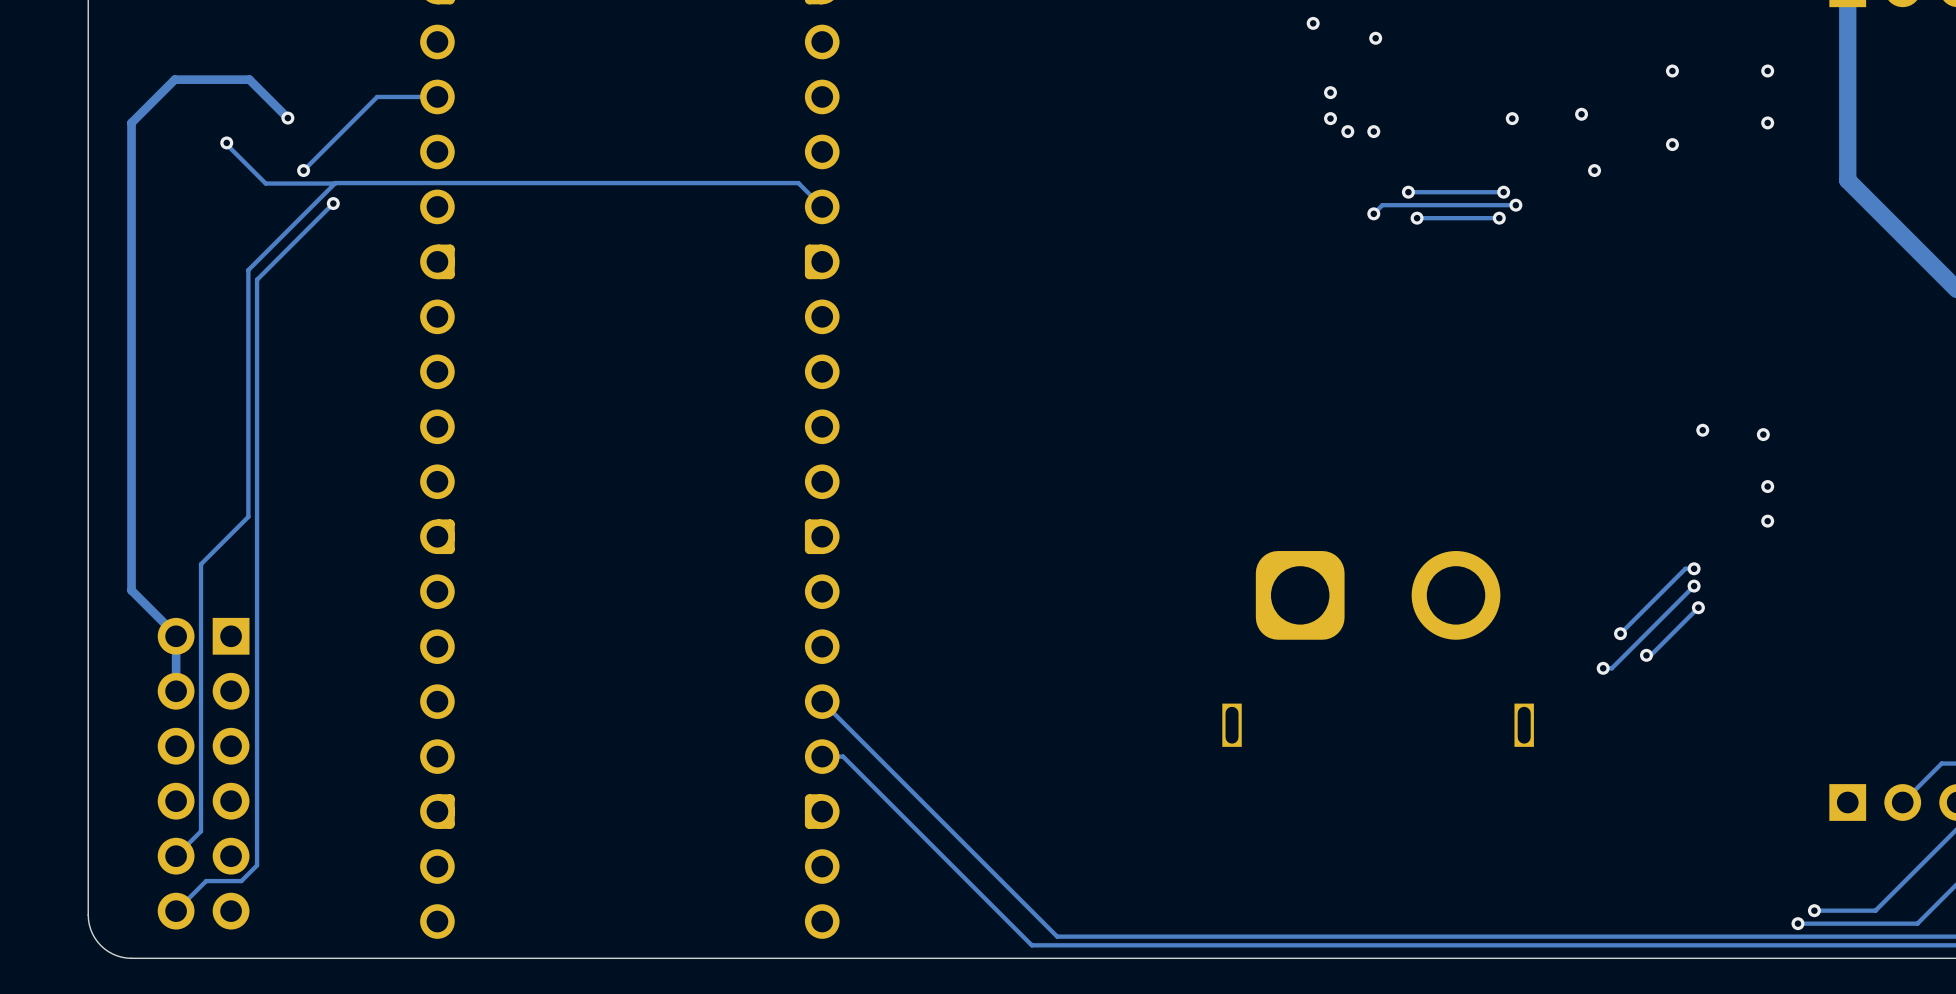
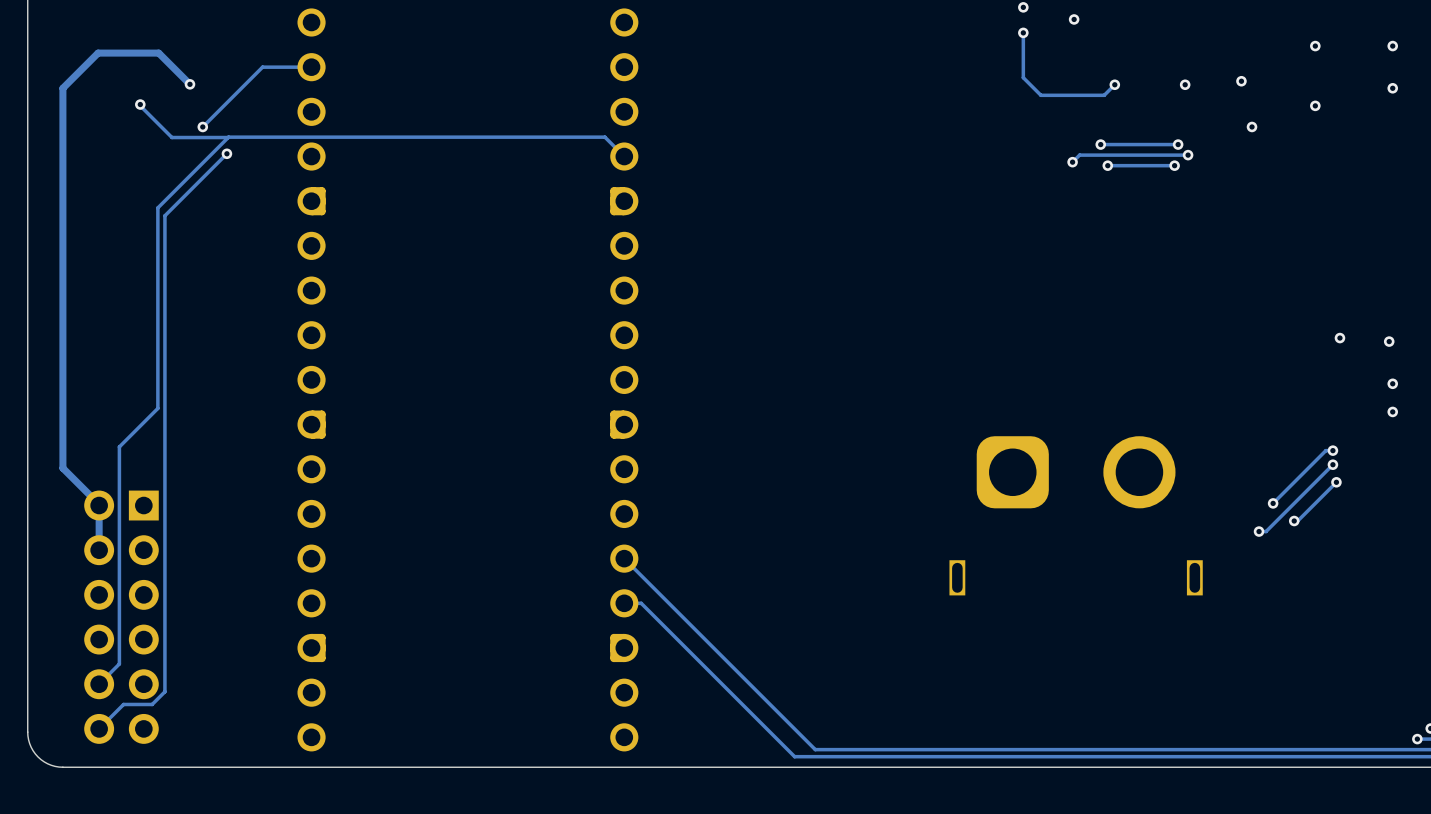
track: none -> (1023, 32) (1023, 77) (1040, 95) (1104, 95) (1114, 84)
via: none -> (1023, 32)
via: (1330, 92) -> none
via: (1330, 118) -> none
via: none -> (1114, 84)
via: (1347, 131) -> none
via: (1373, 131) -> none

